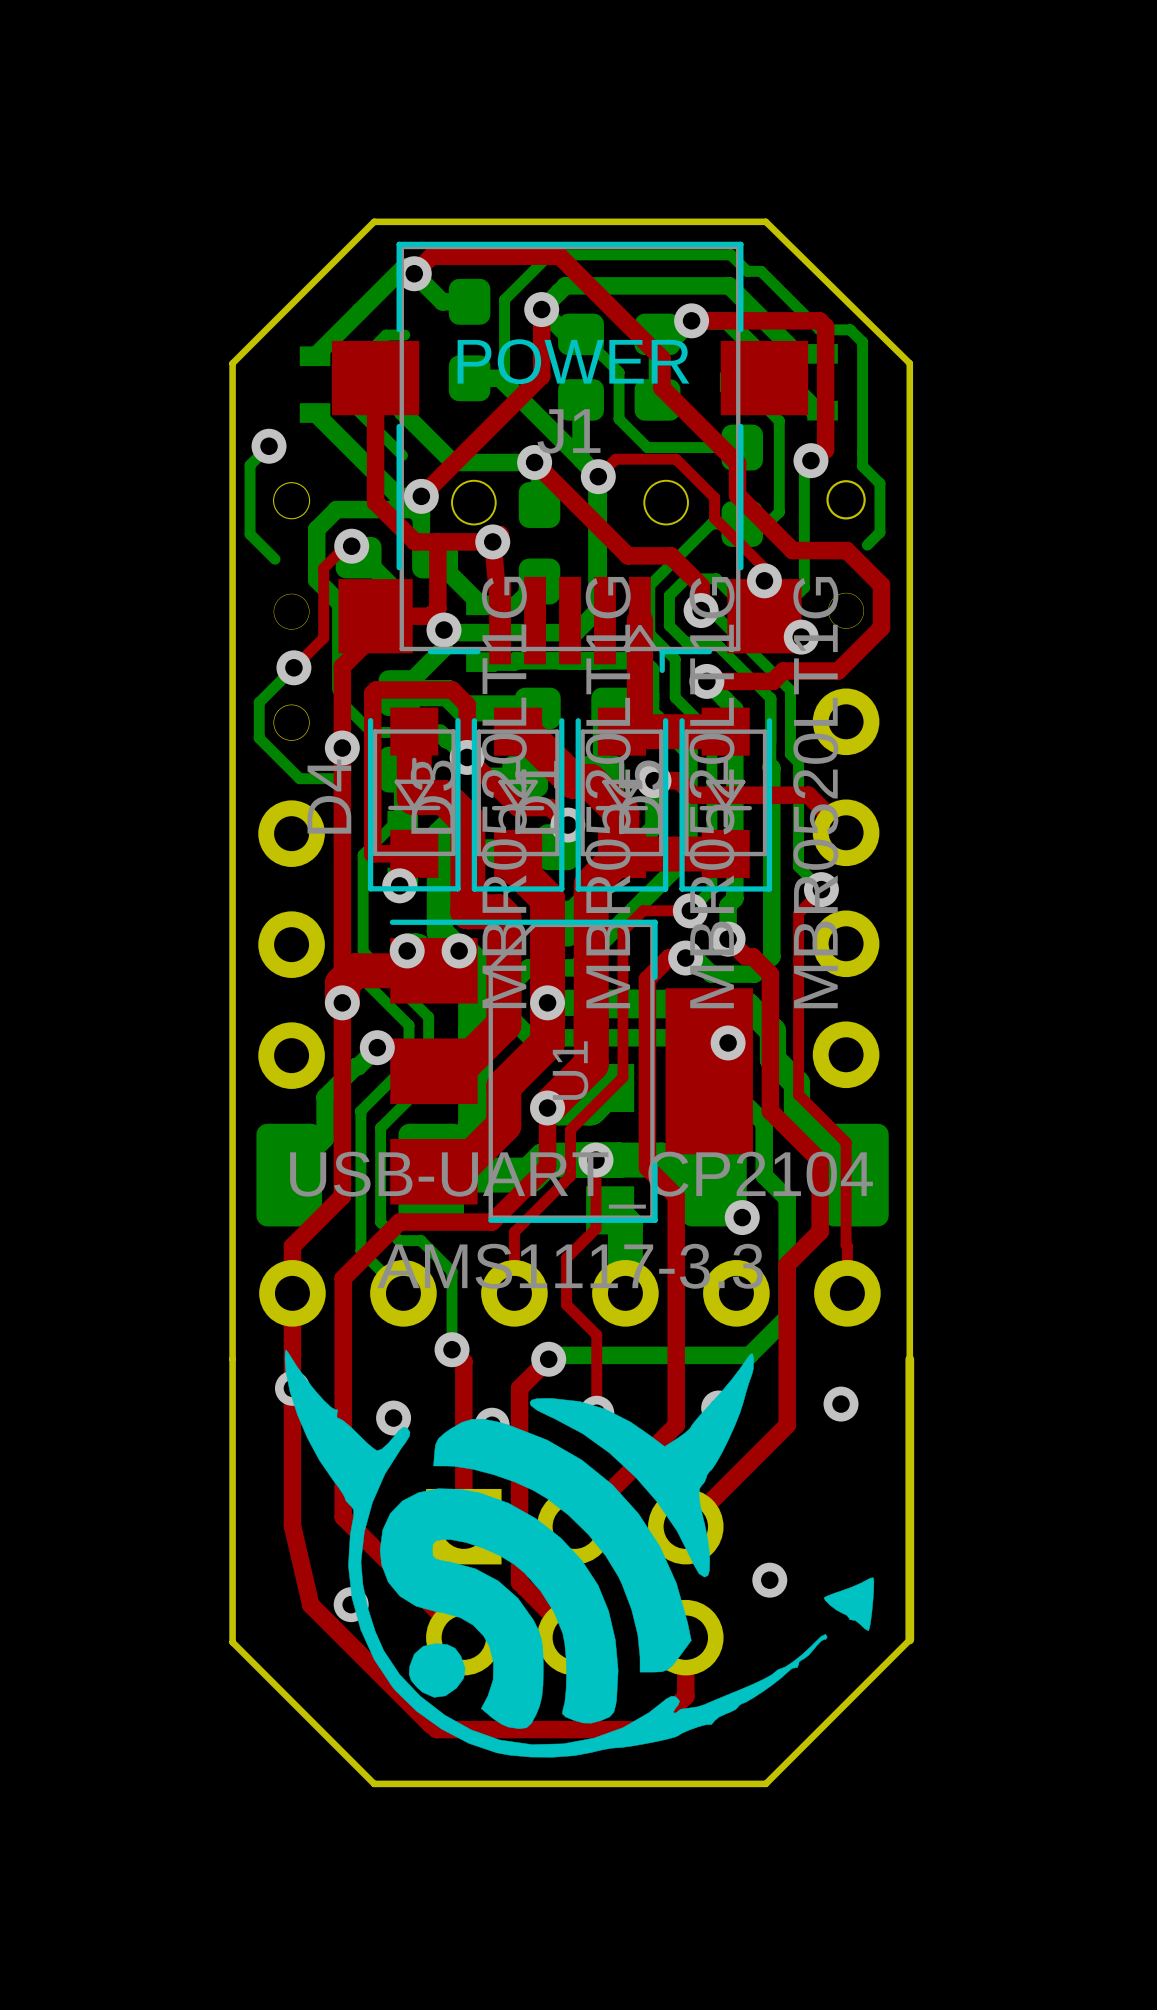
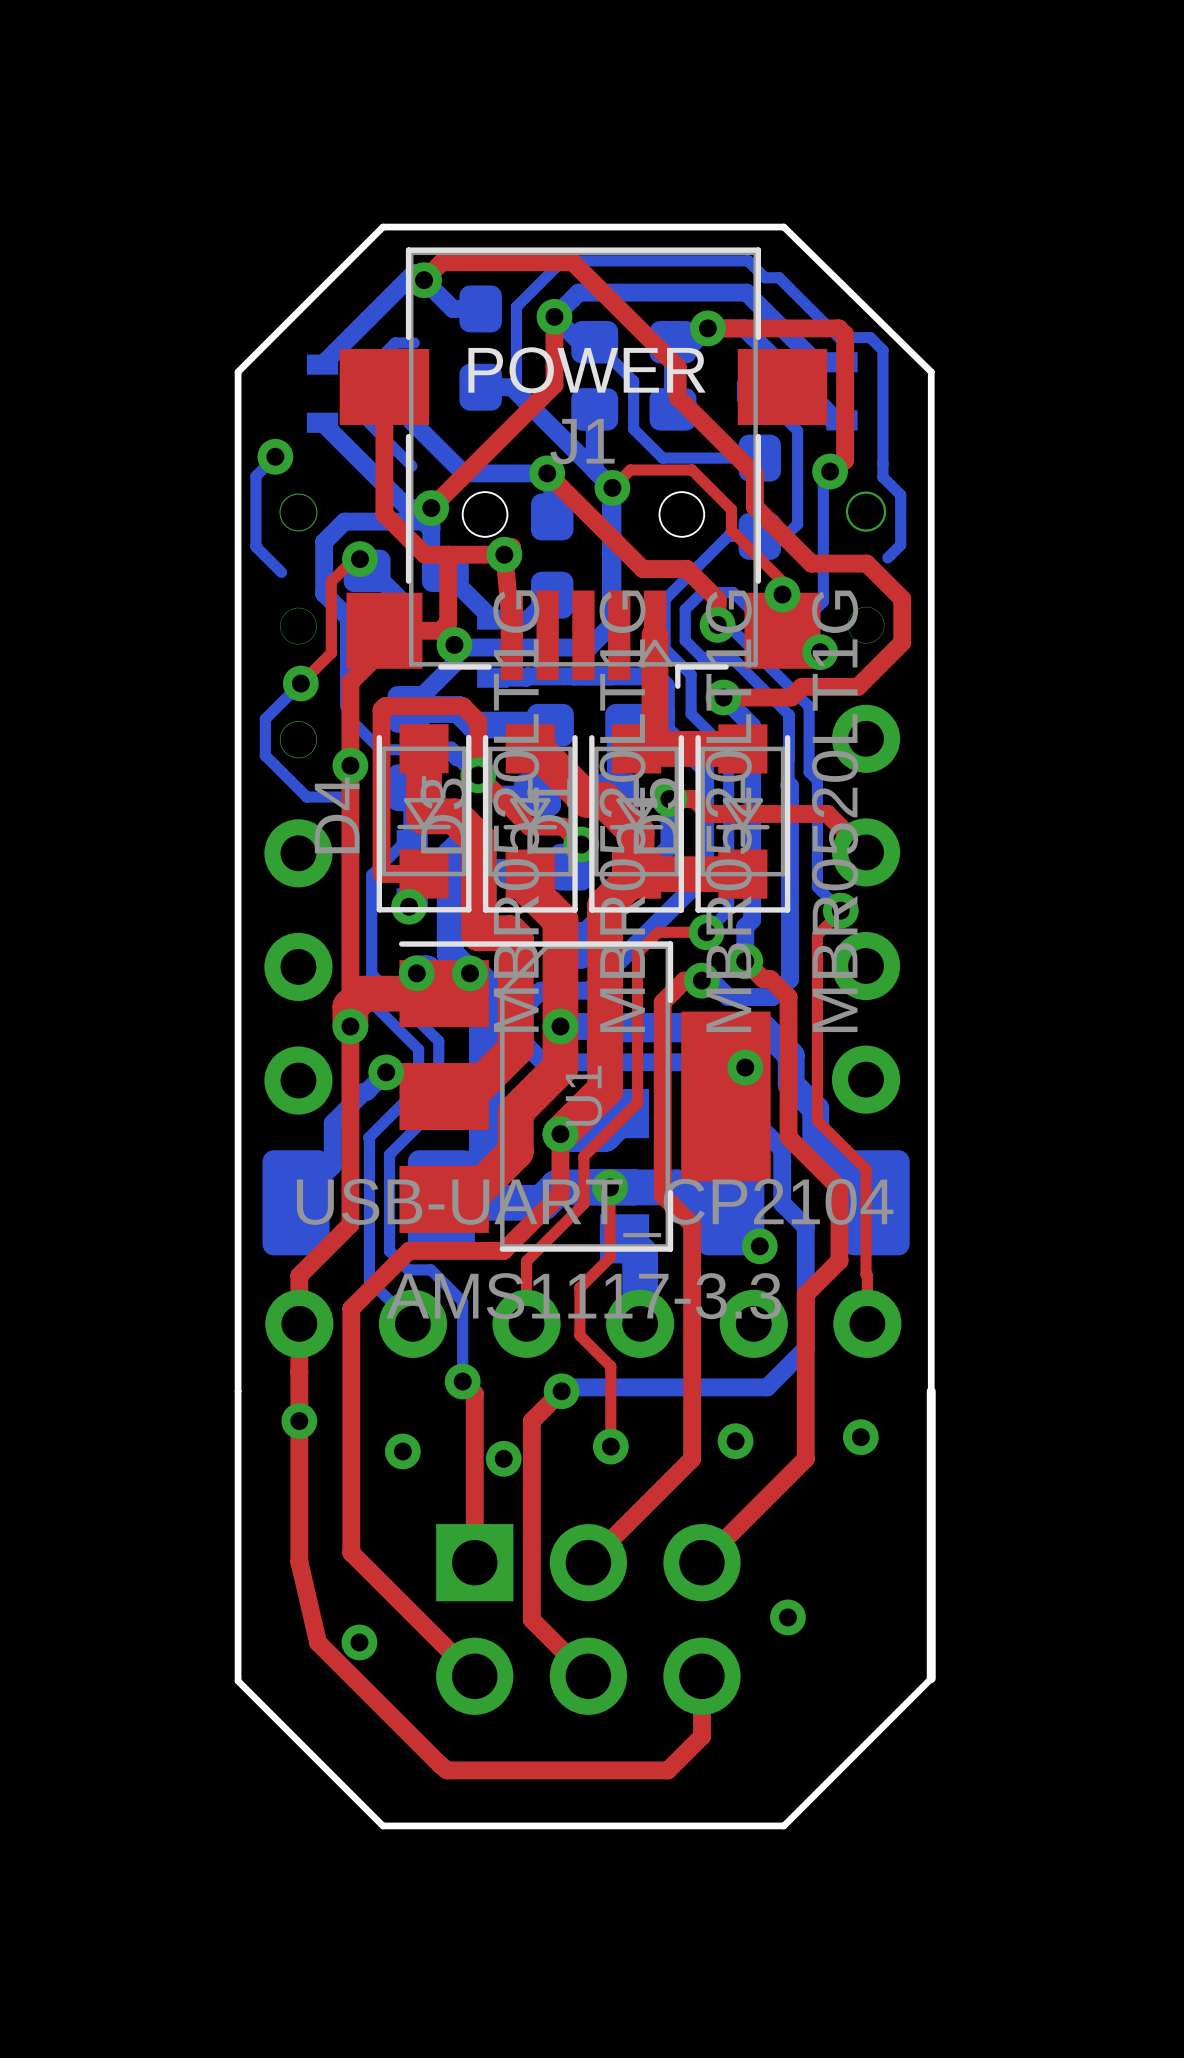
drawing: [284, 1349, 875, 1758] -> none

